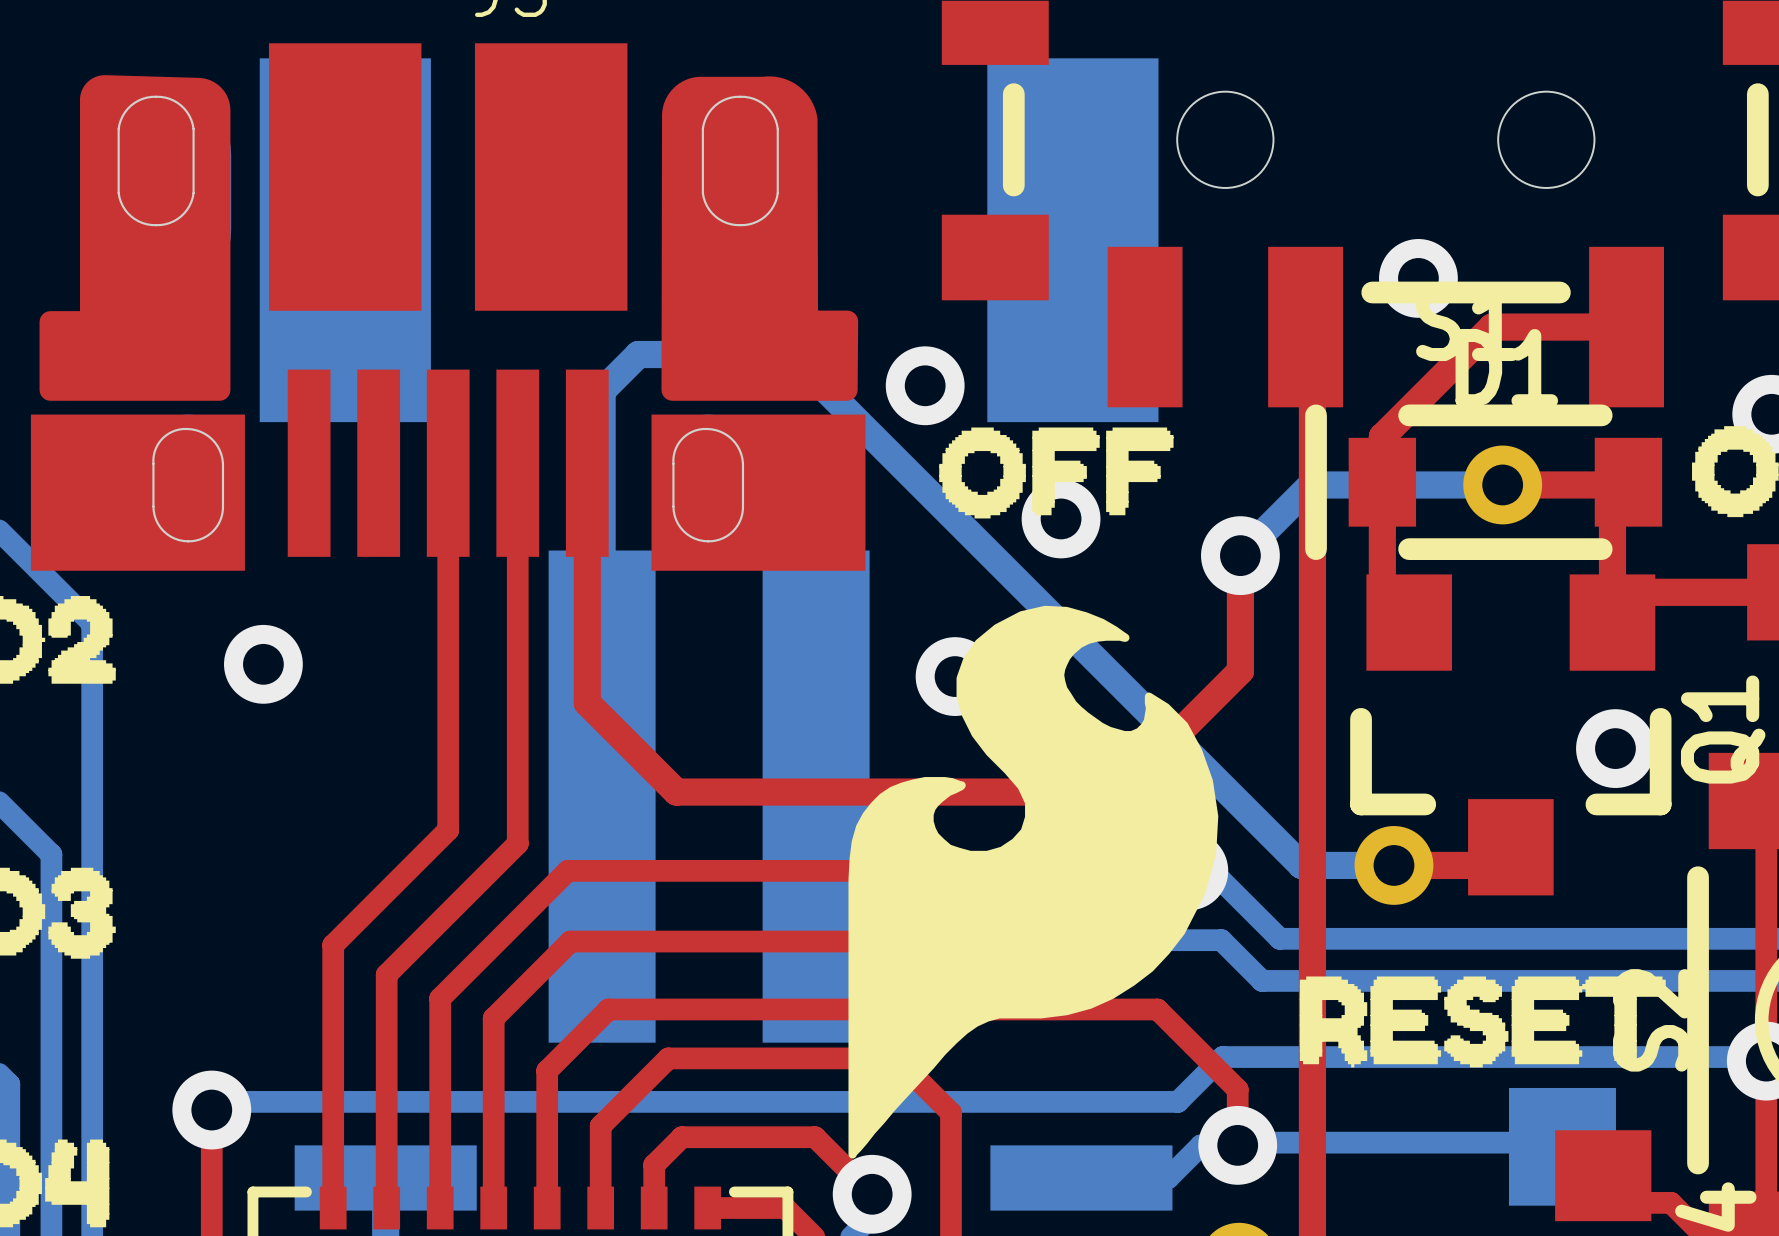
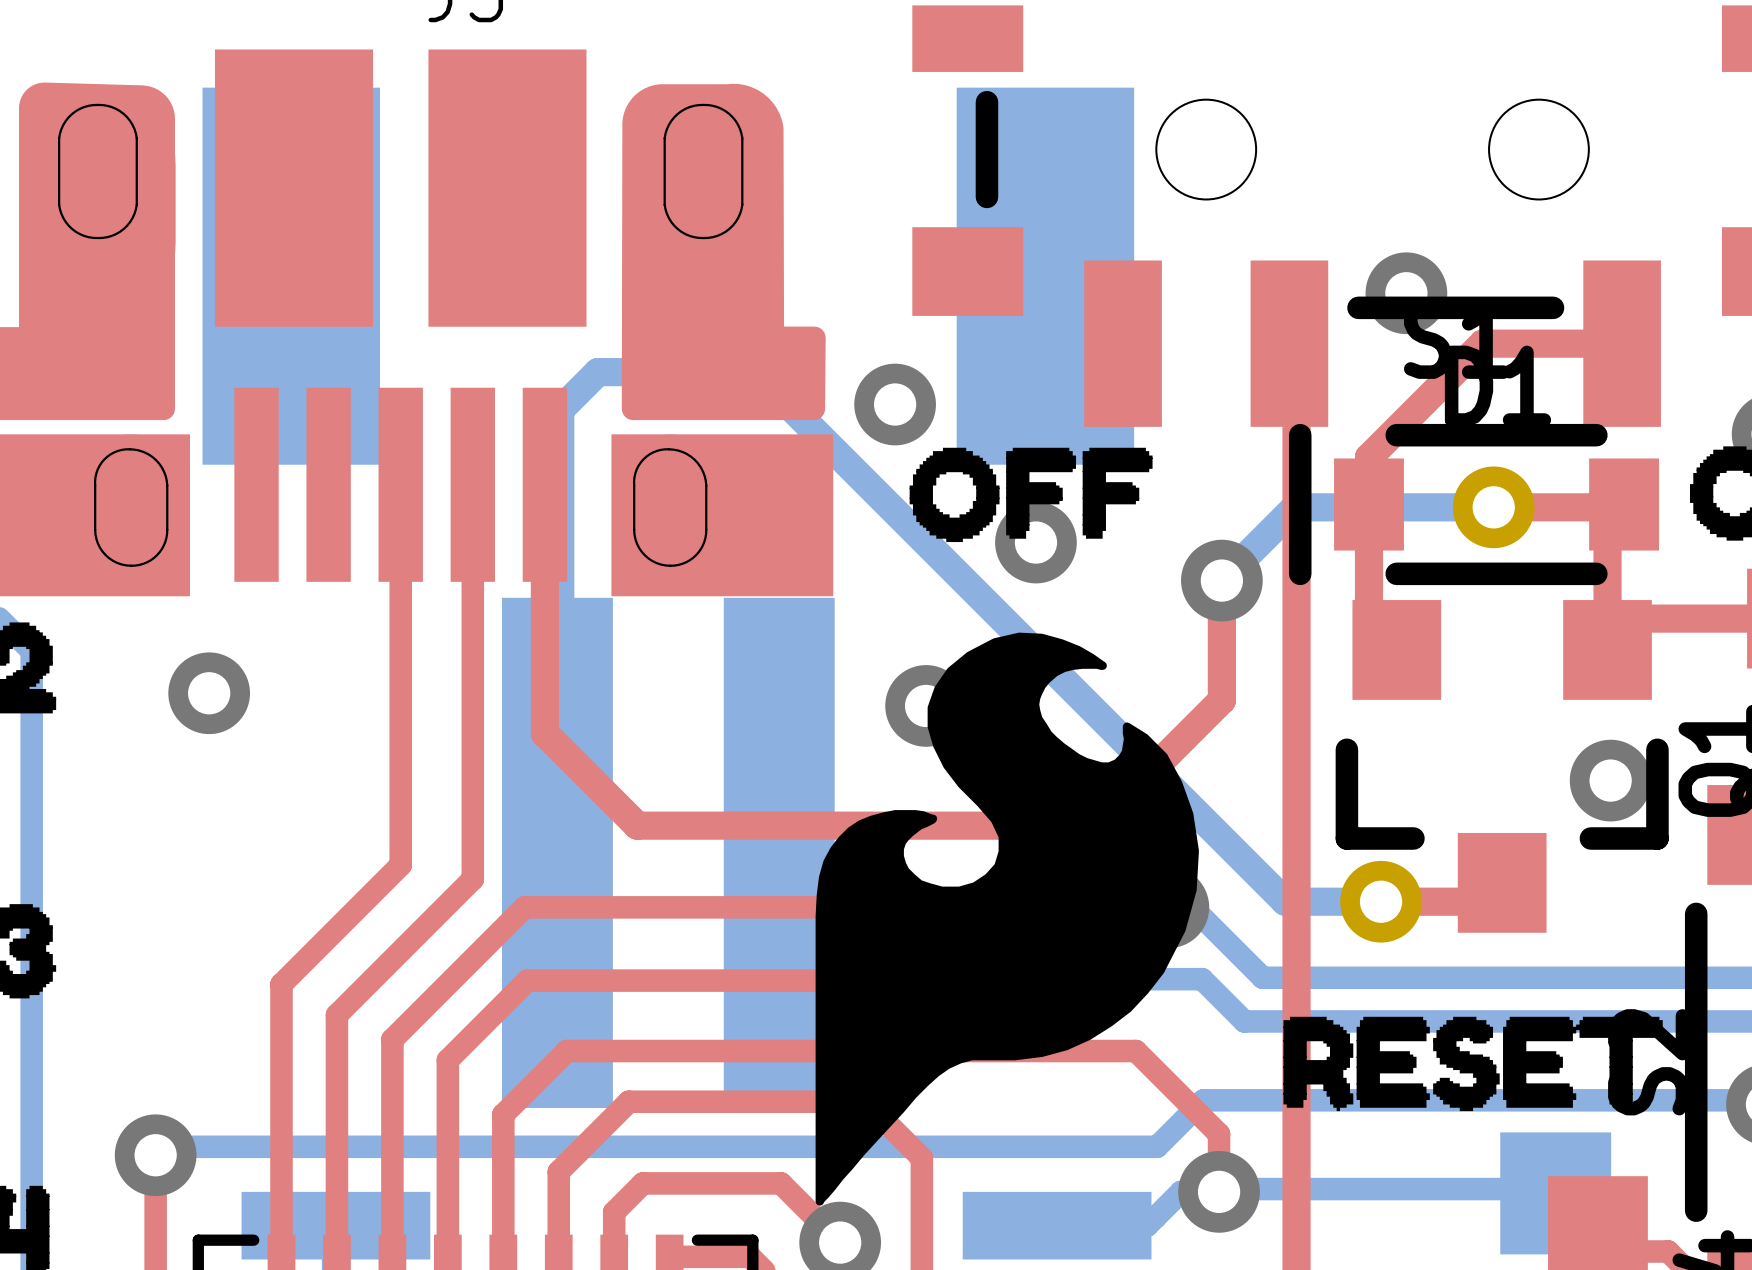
part position: (709, 550) -> (668, 597)

